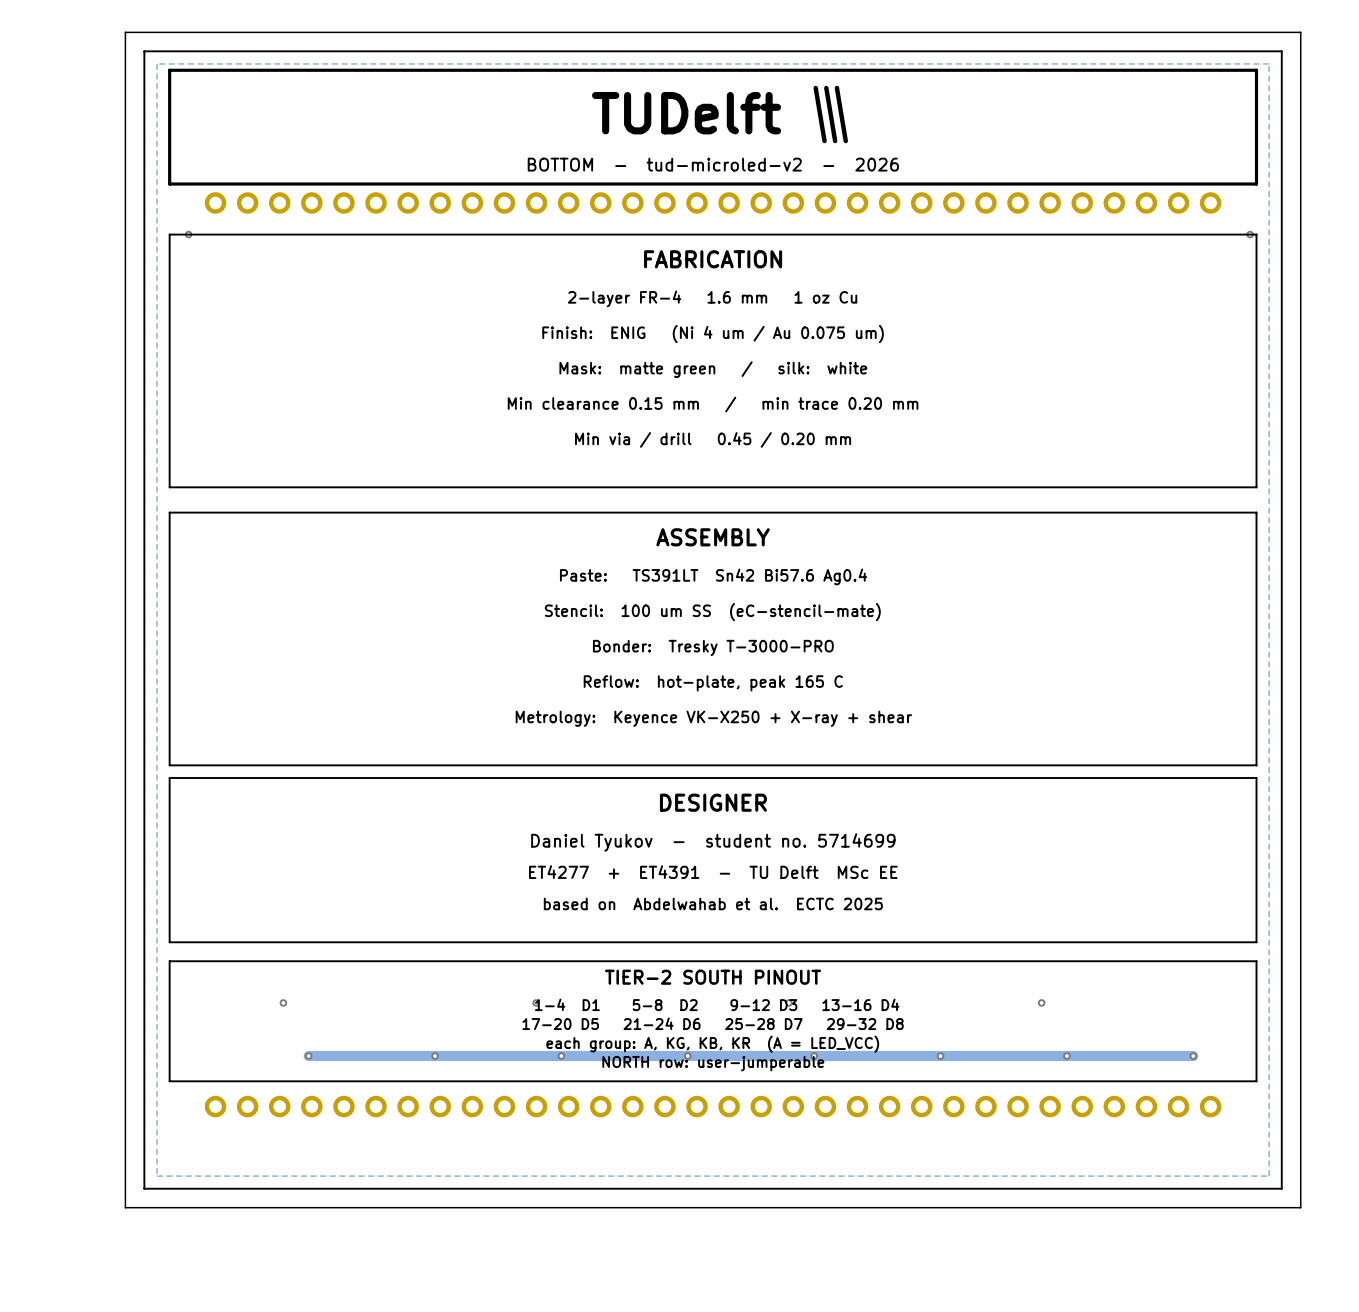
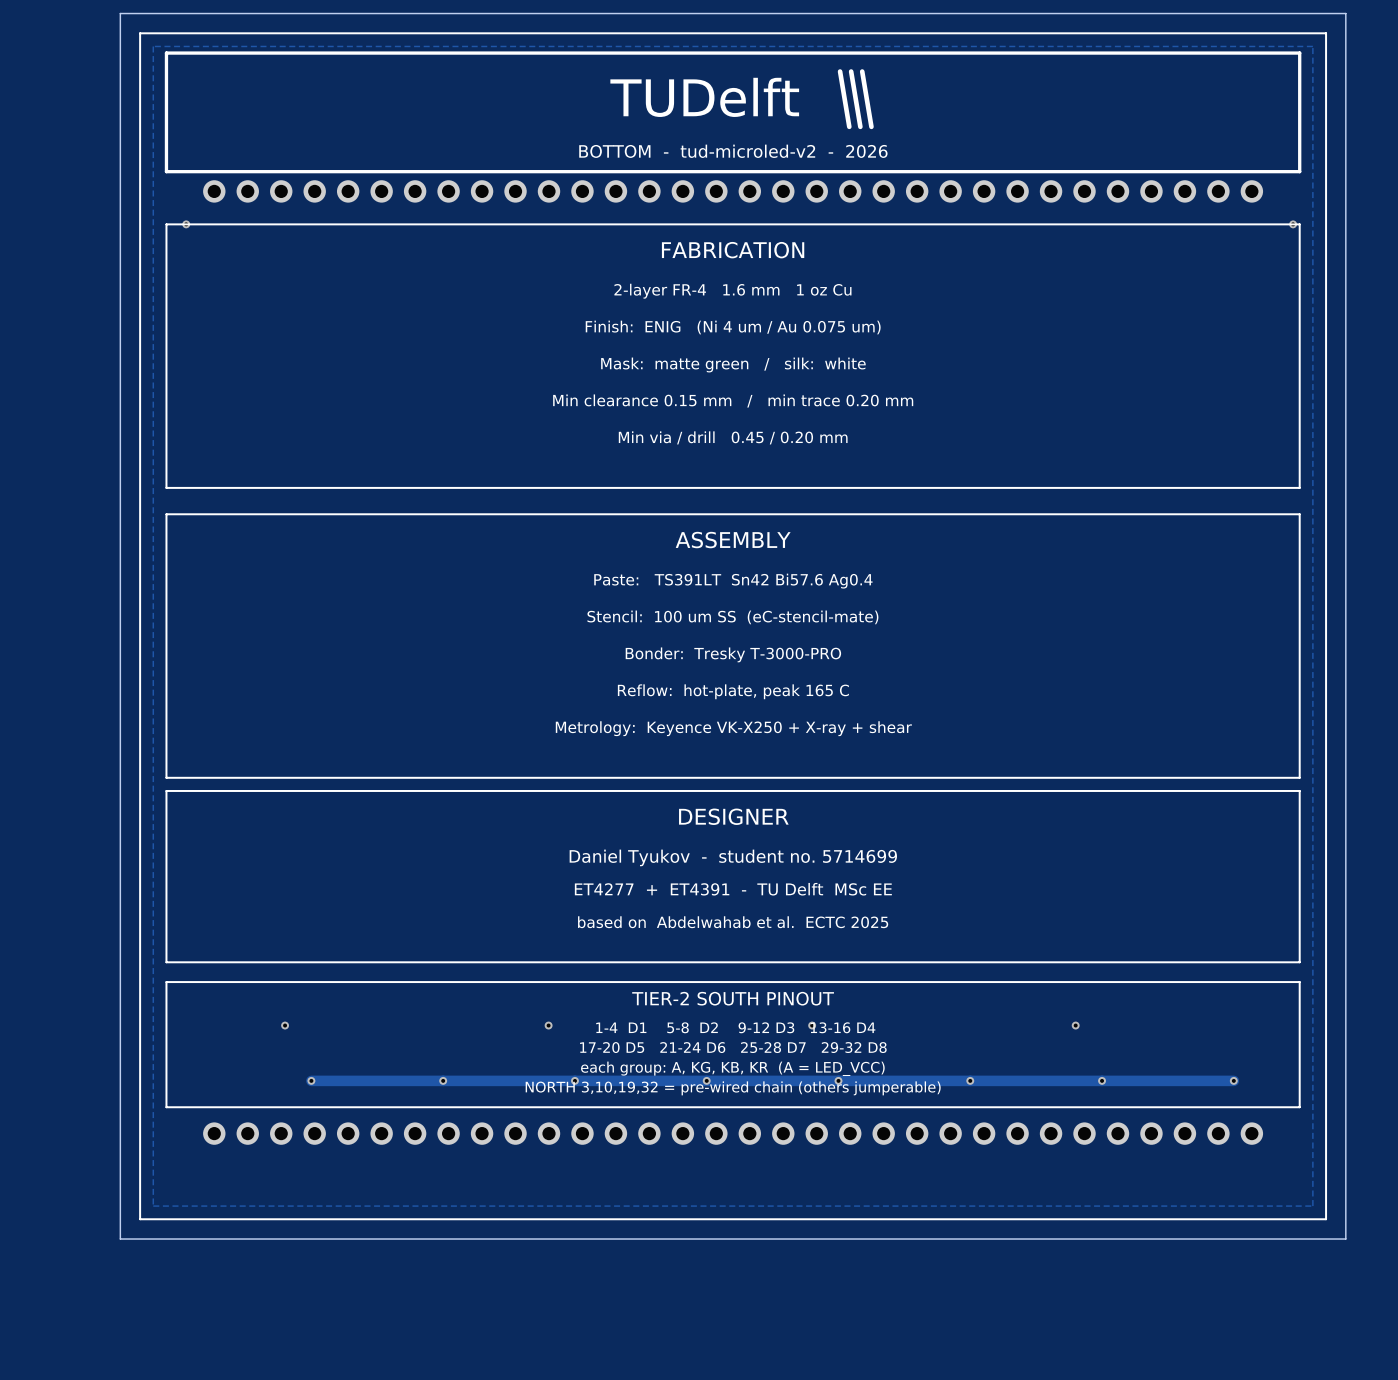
text: NORTH row: user-jumperable (713, 1063) -> NORTH 3,10,19,32 = pre-wired chain (others jumperable) (733, 1088)

